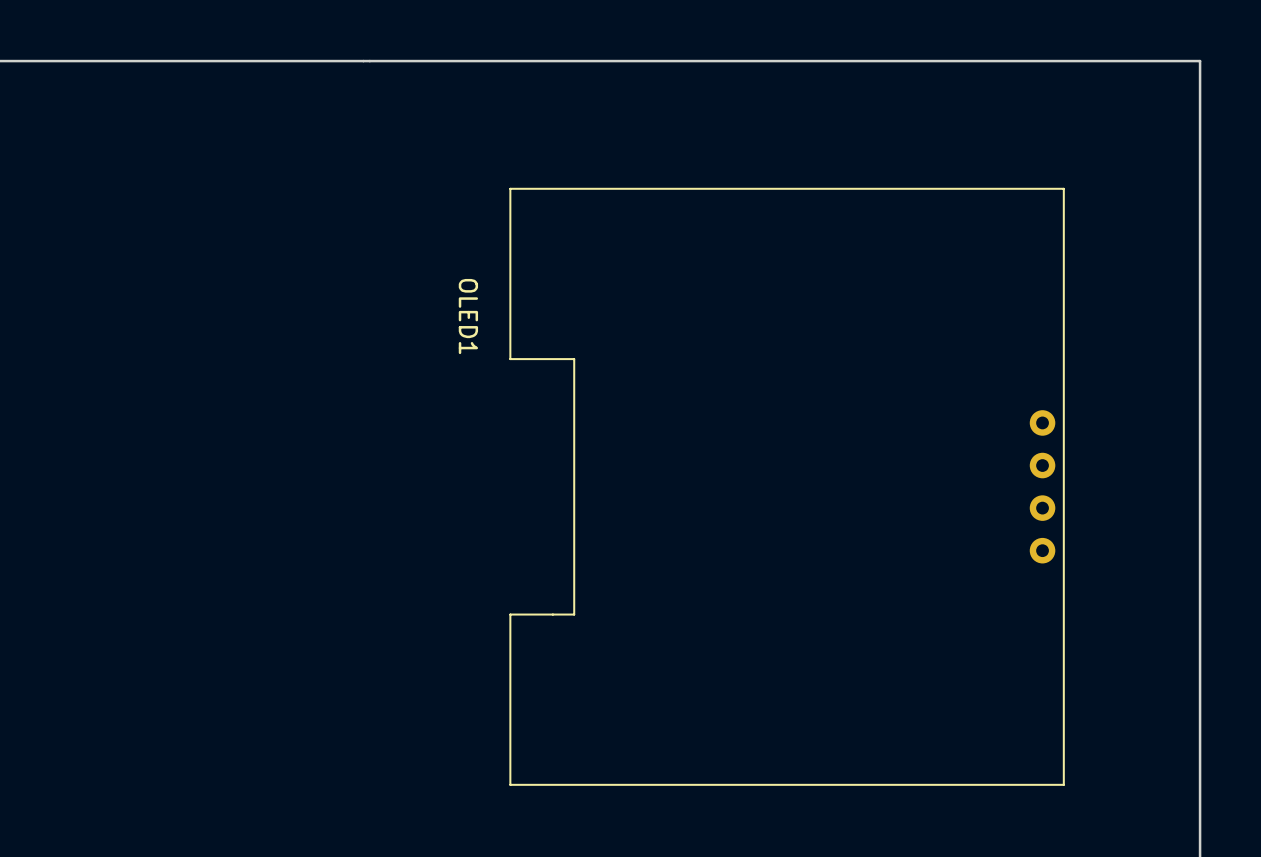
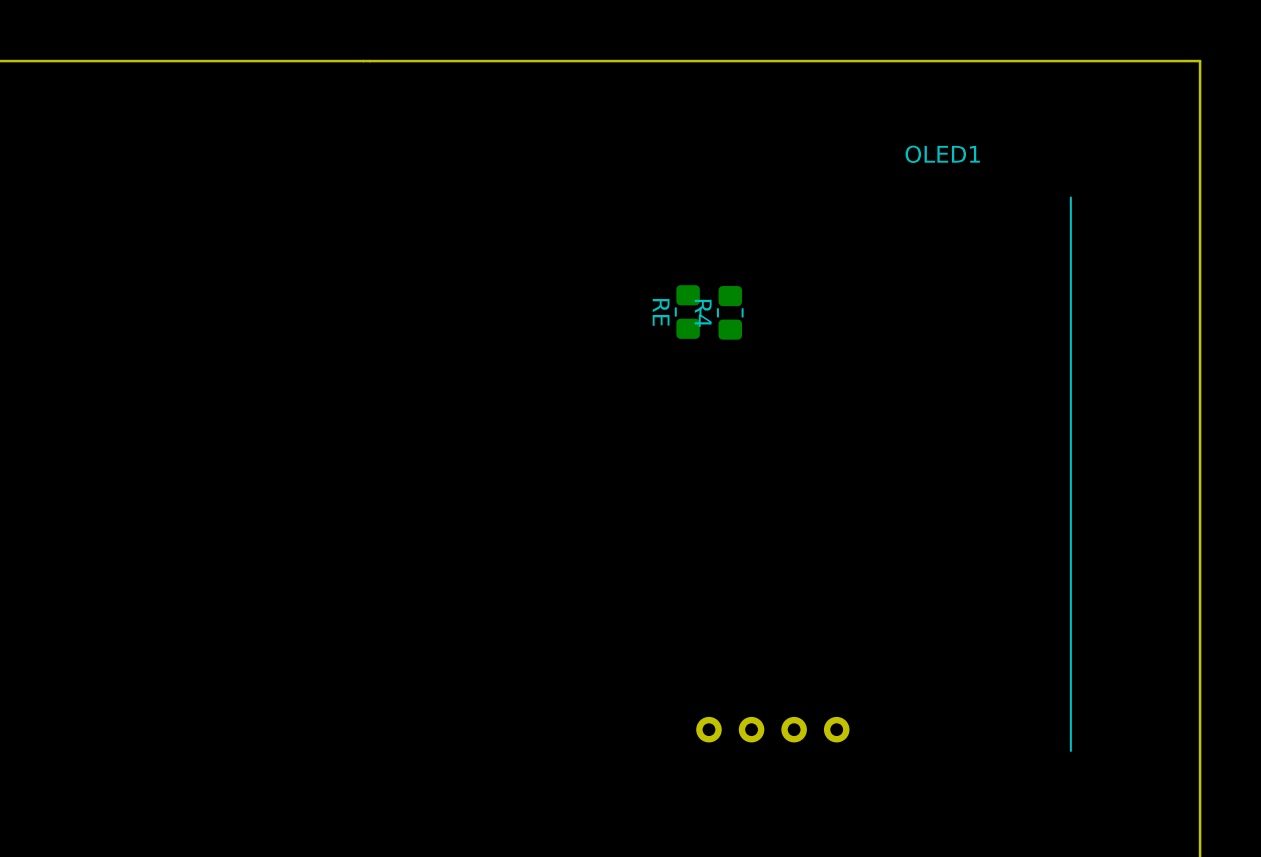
OLED1 footprint: [509, 187, 1065, 786] -> [696, 196, 1072, 752]
RE: none -> (688, 312)
R4: none -> (730, 312)
OLED1 name position: OLED1 (468, 316) -> OLED1 (942, 154)

